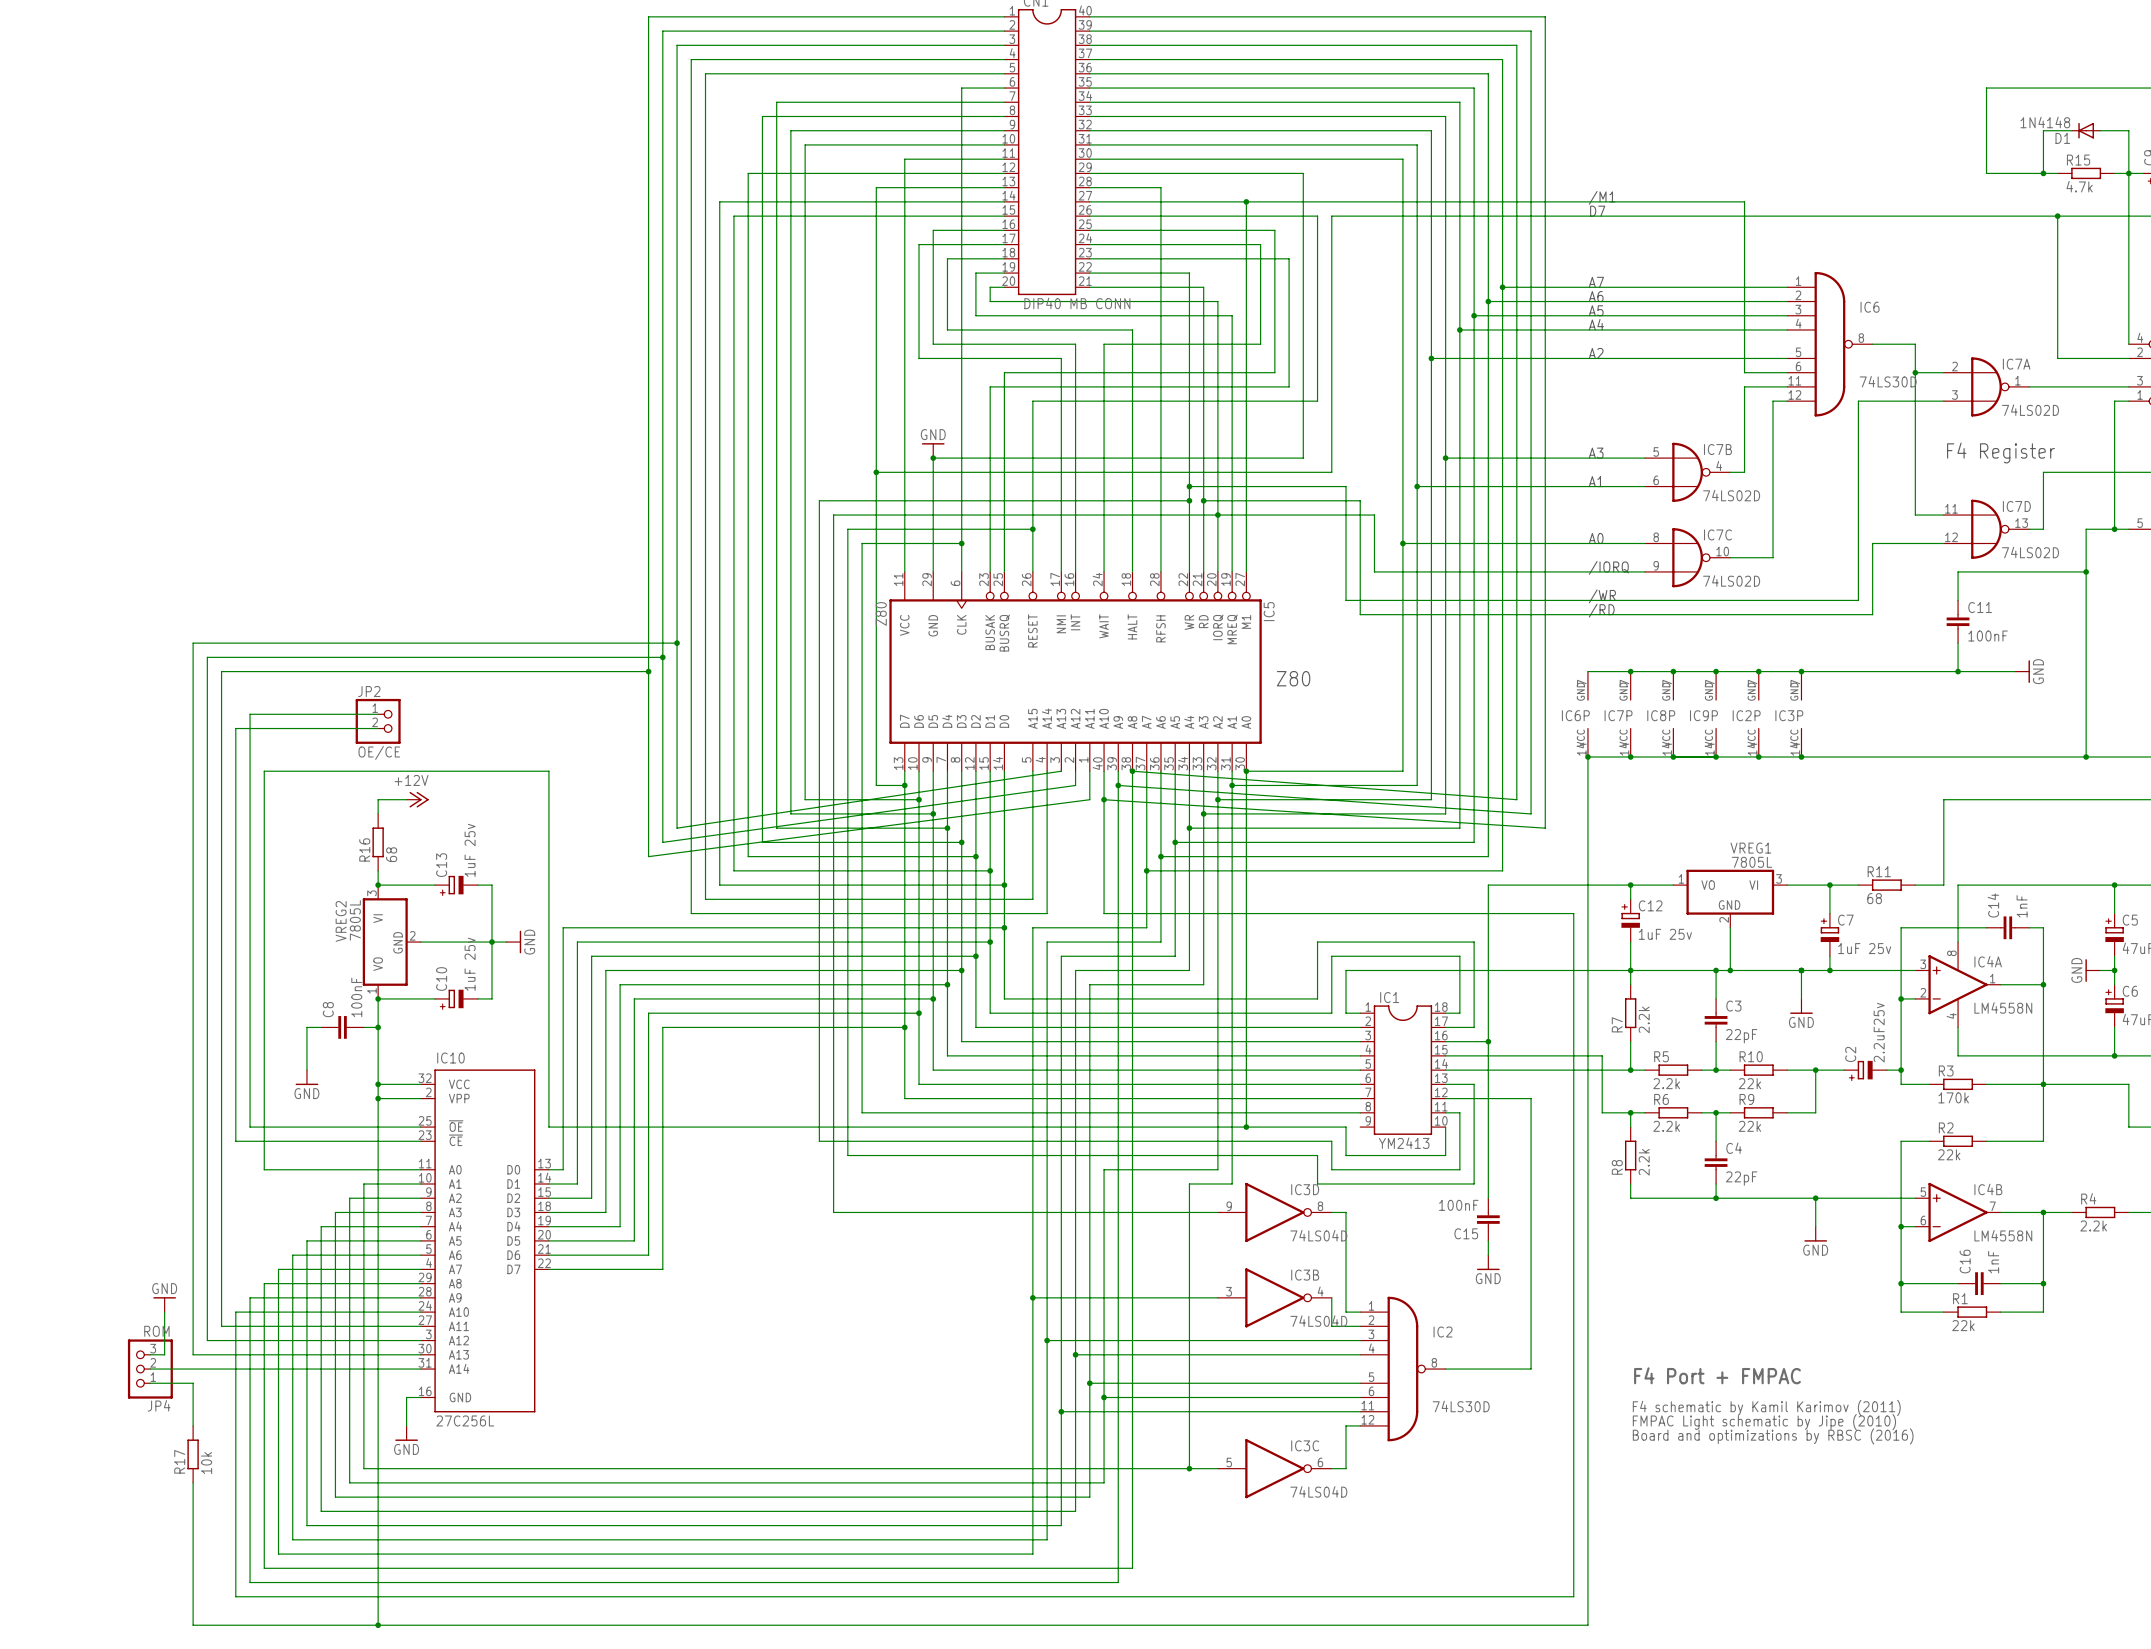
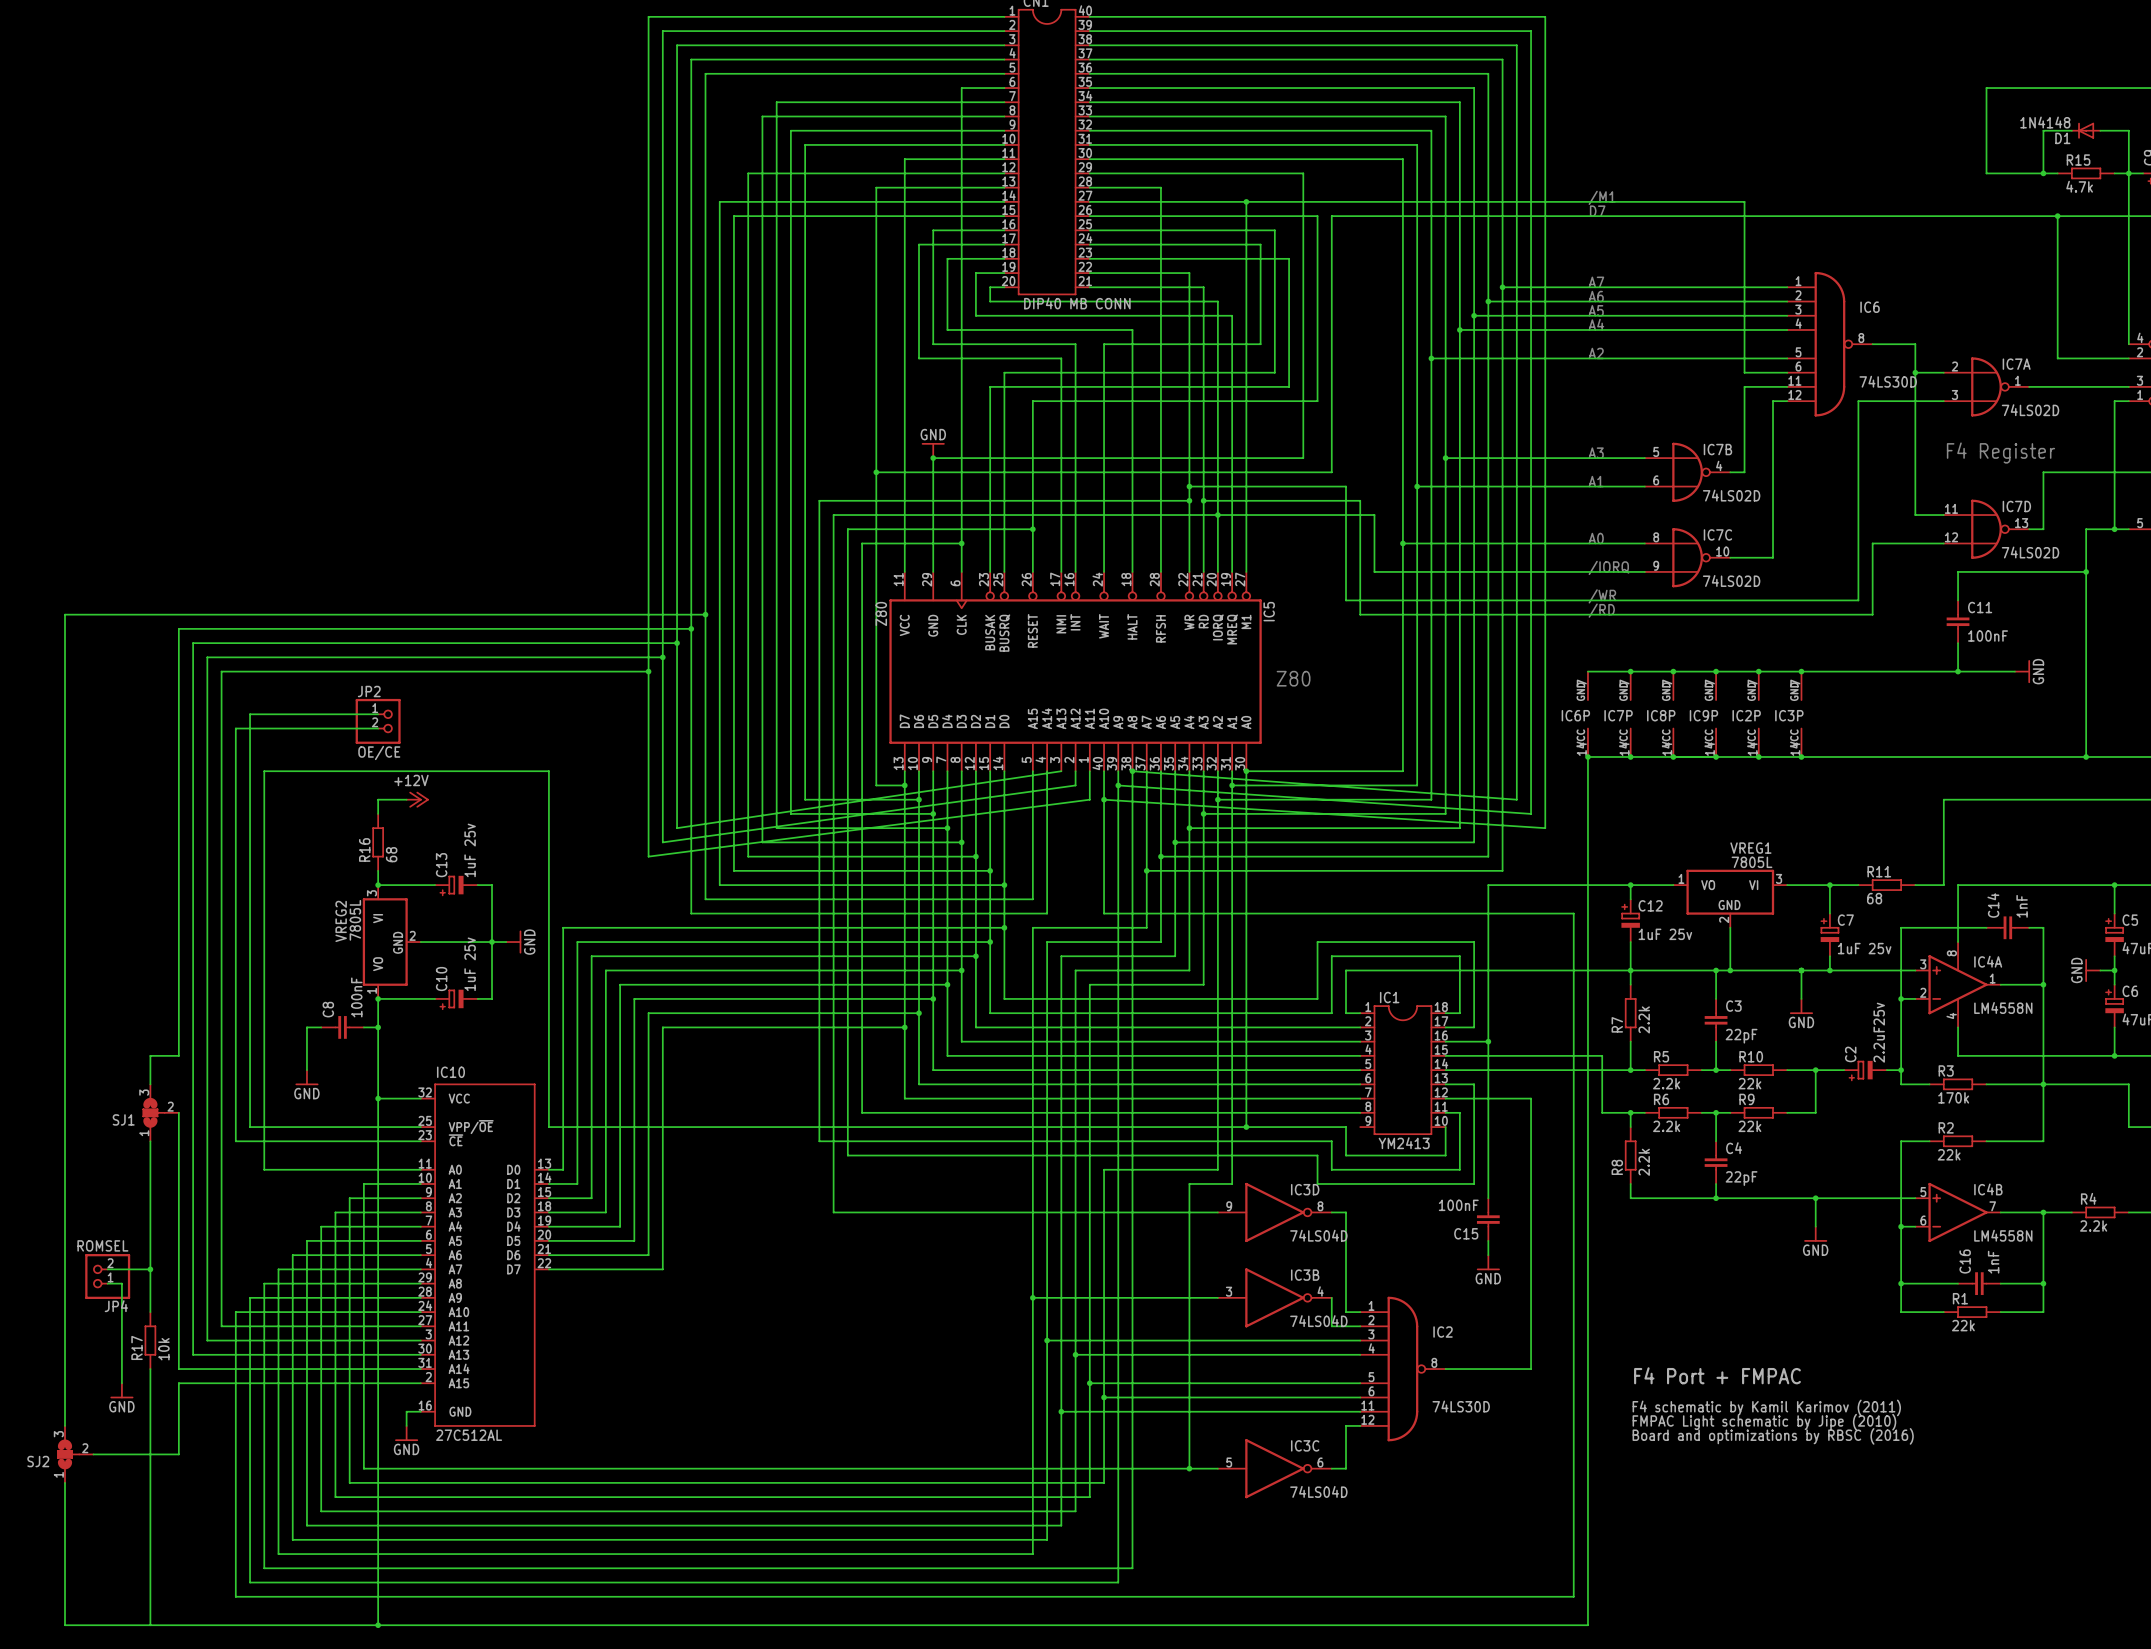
wire: none -> (705, 614) (65, 614) (65, 1425)
junction: none -> (705, 614)
wire: none -> (691, 628) (178, 628) (178, 1055) (150, 1055) (150, 1084)
junction: none -> (691, 628)
IC10 symbol: [420, 1069, 549, 1413] -> [420, 1083, 549, 1427]
wire: (378, 1084) (420, 1084) -> none
junction: (378, 1084) -> none
SJ1: none -> (160, 1112)
wire: none -> (150, 1141) (150, 1312)
wire: none -> (107, 1269) (150, 1269)
junction: none -> (150, 1269)
wire: none -> (107, 1283) (121, 1283) (121, 1383)
power symbol rotation: 0° (164, 1297) -> 180° (121, 1397)
power symbol position: GND (164, 1304) -> GND (121, 1390)
wire: (164, 1312) (164, 1354) (150, 1354) -> none
JP4 value: ROM (156, 1331) -> ROMSEL (102, 1245)
JP4 symbol: [127, 1339, 173, 1399] -> [85, 1254, 131, 1300]
wire: (150, 1369) (178, 1369) -> (178, 1112) (178, 1369)
wire: none -> (150, 1369) (150, 1625)
wire: (150, 1383) (178, 1383) -> (93, 1454) (178, 1454) (178, 1383)
wire: (193, 1383) (193, 1425) -> (193, 1383) (420, 1383)
wire: (420, 1397) (406, 1397) (406, 1411) -> (420, 1411) (406, 1411)
IC10 value: 27C256L (465, 1420) -> 27C512AL (469, 1435)
SJ2: none -> (75, 1454)
R17 position: (193, 1454) -> (150, 1340)
wire: (193, 1482) (193, 1625) -> (65, 1482) (65, 1625) (193, 1625)

